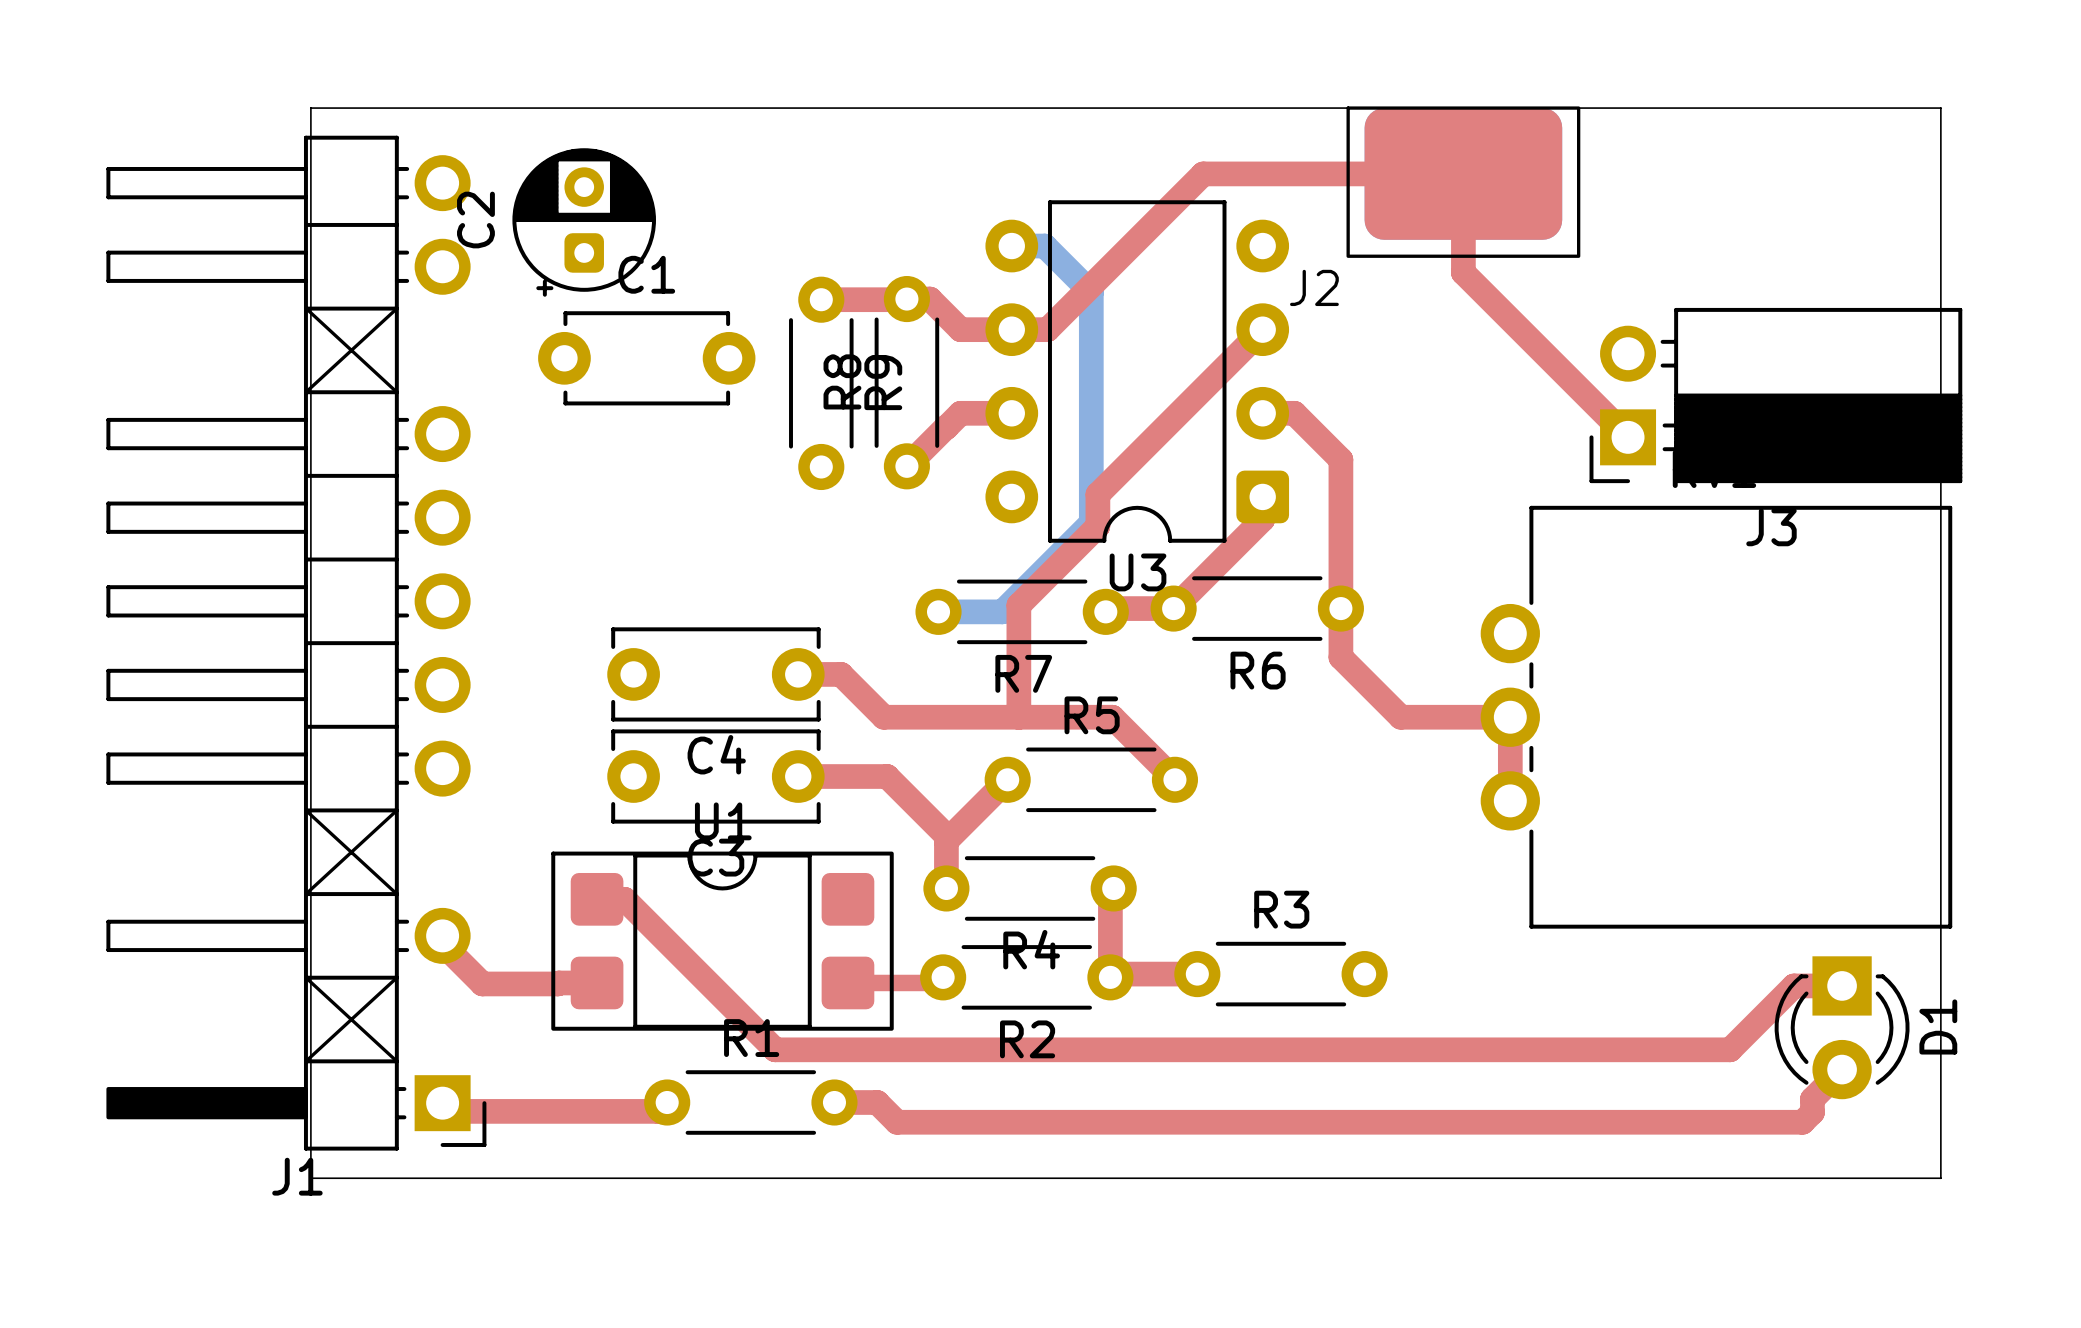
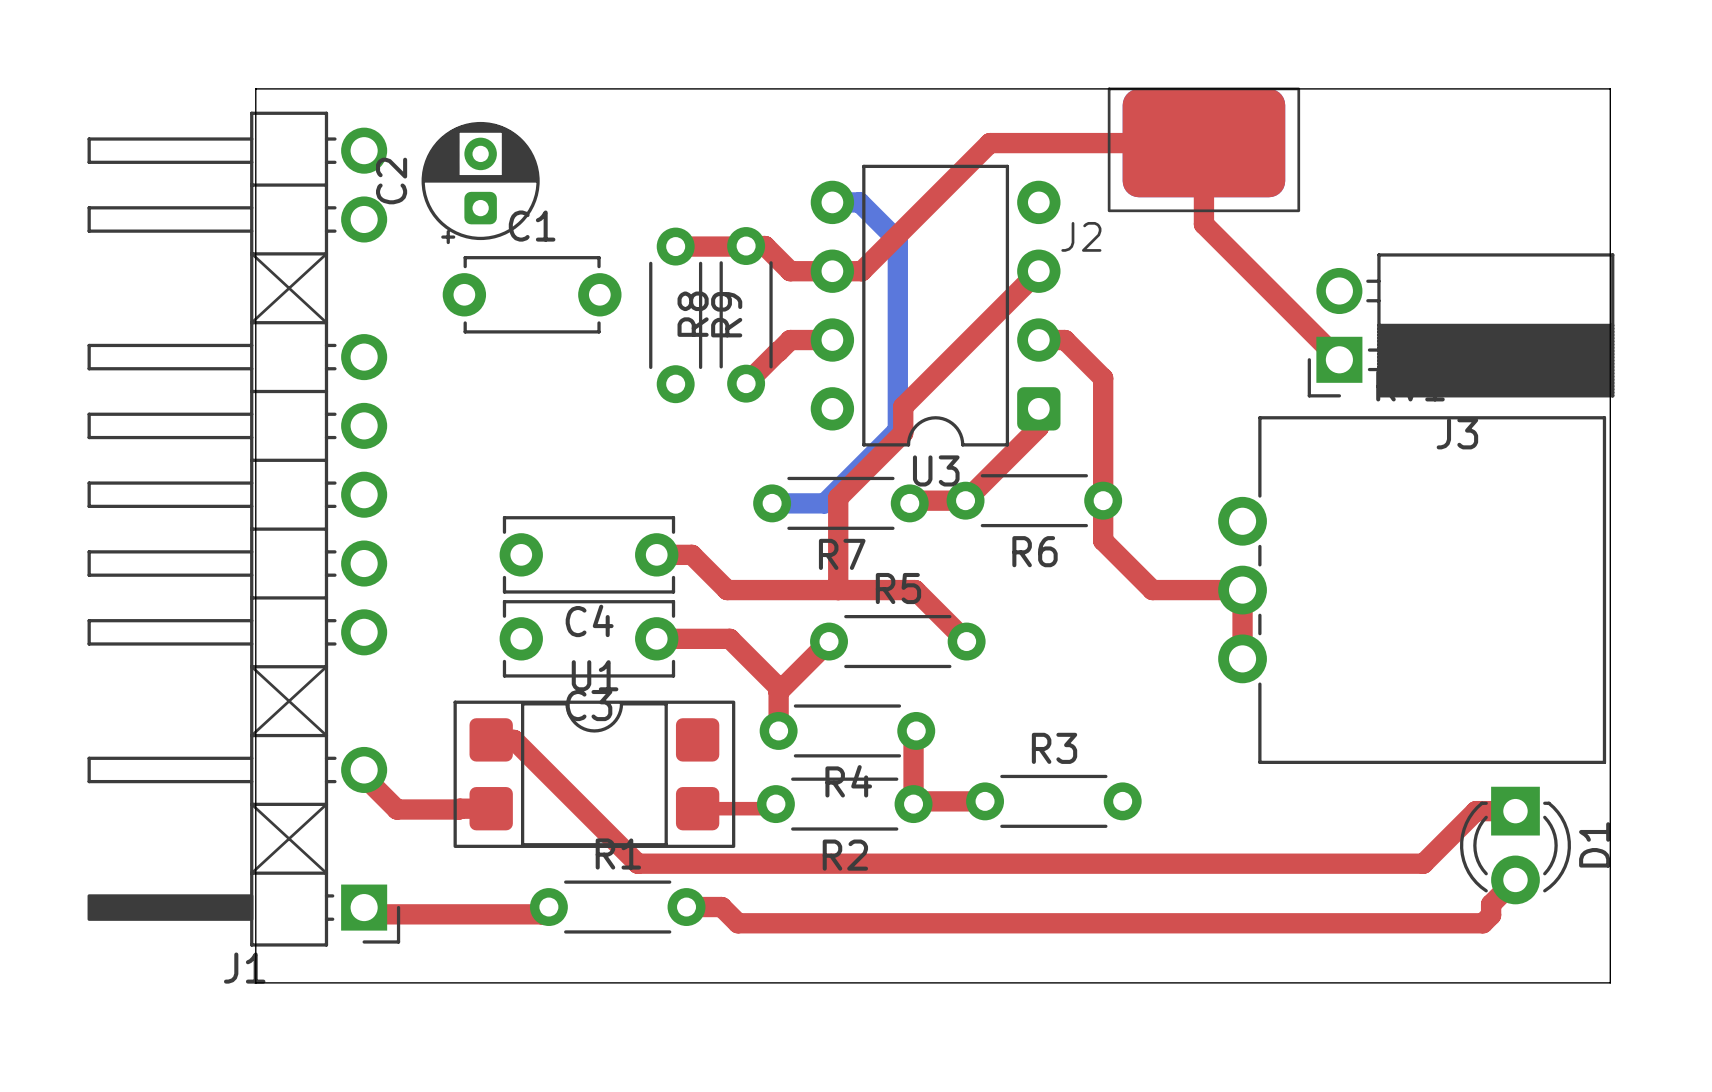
board edge: (1940, 108) (1940, 1178) (310, 1178) -> (1596, 88) (1610, 88) (1610, 982) (255, 982) (255, 969)

